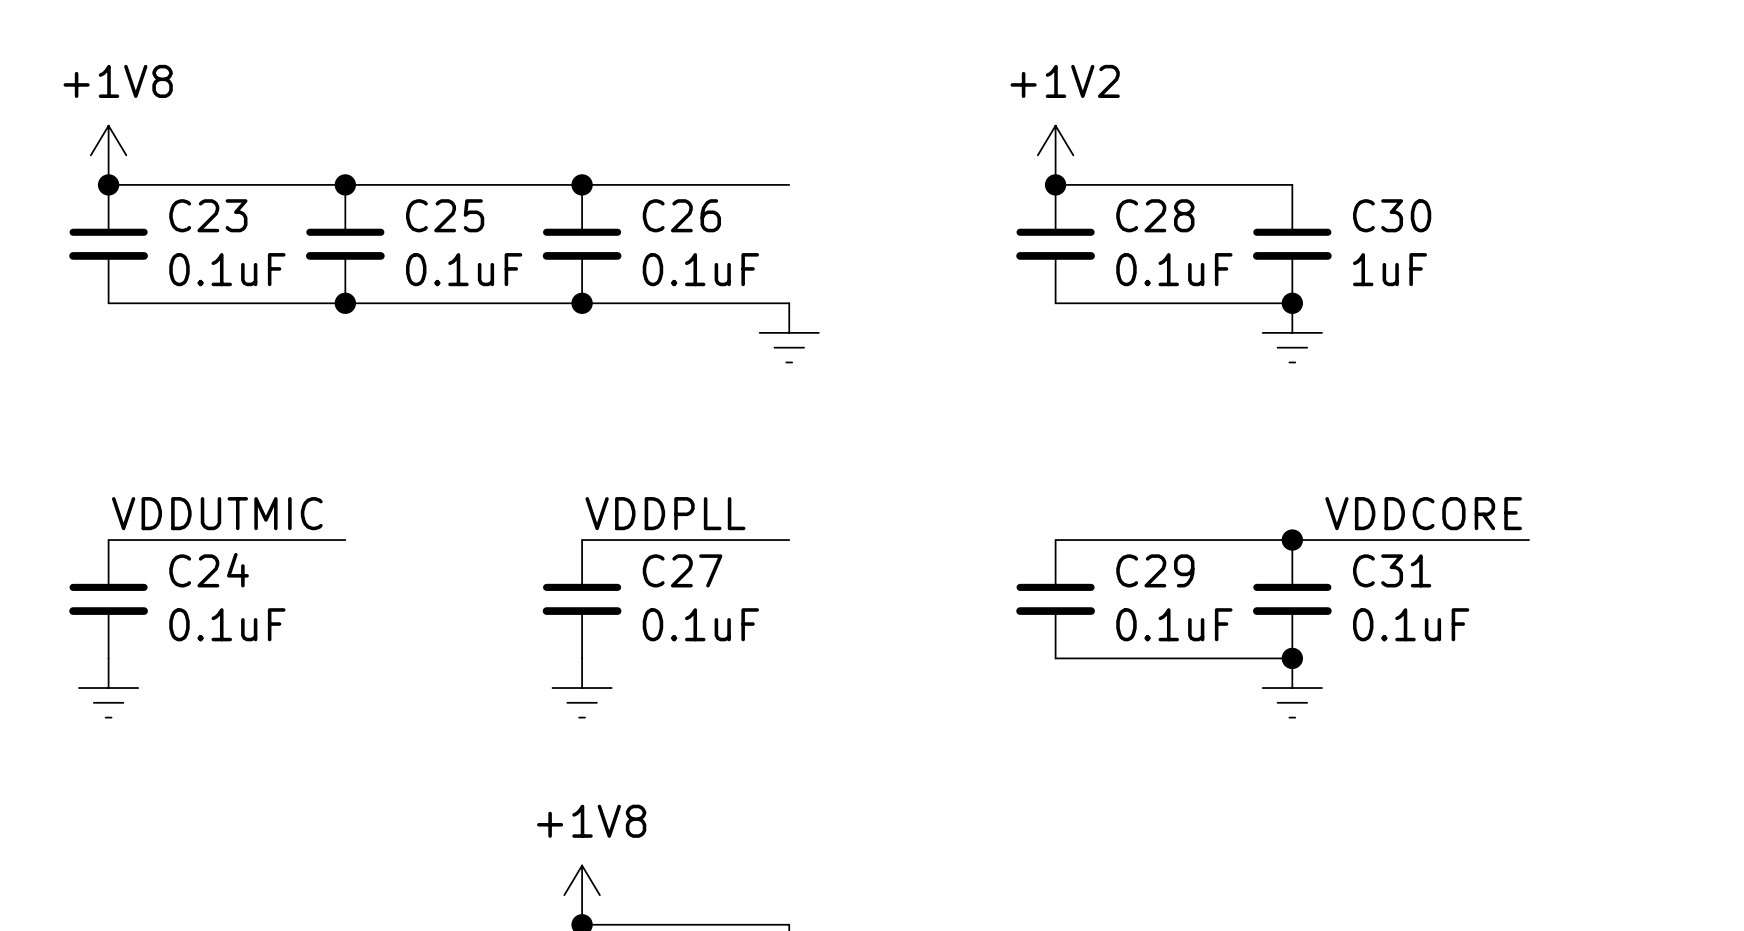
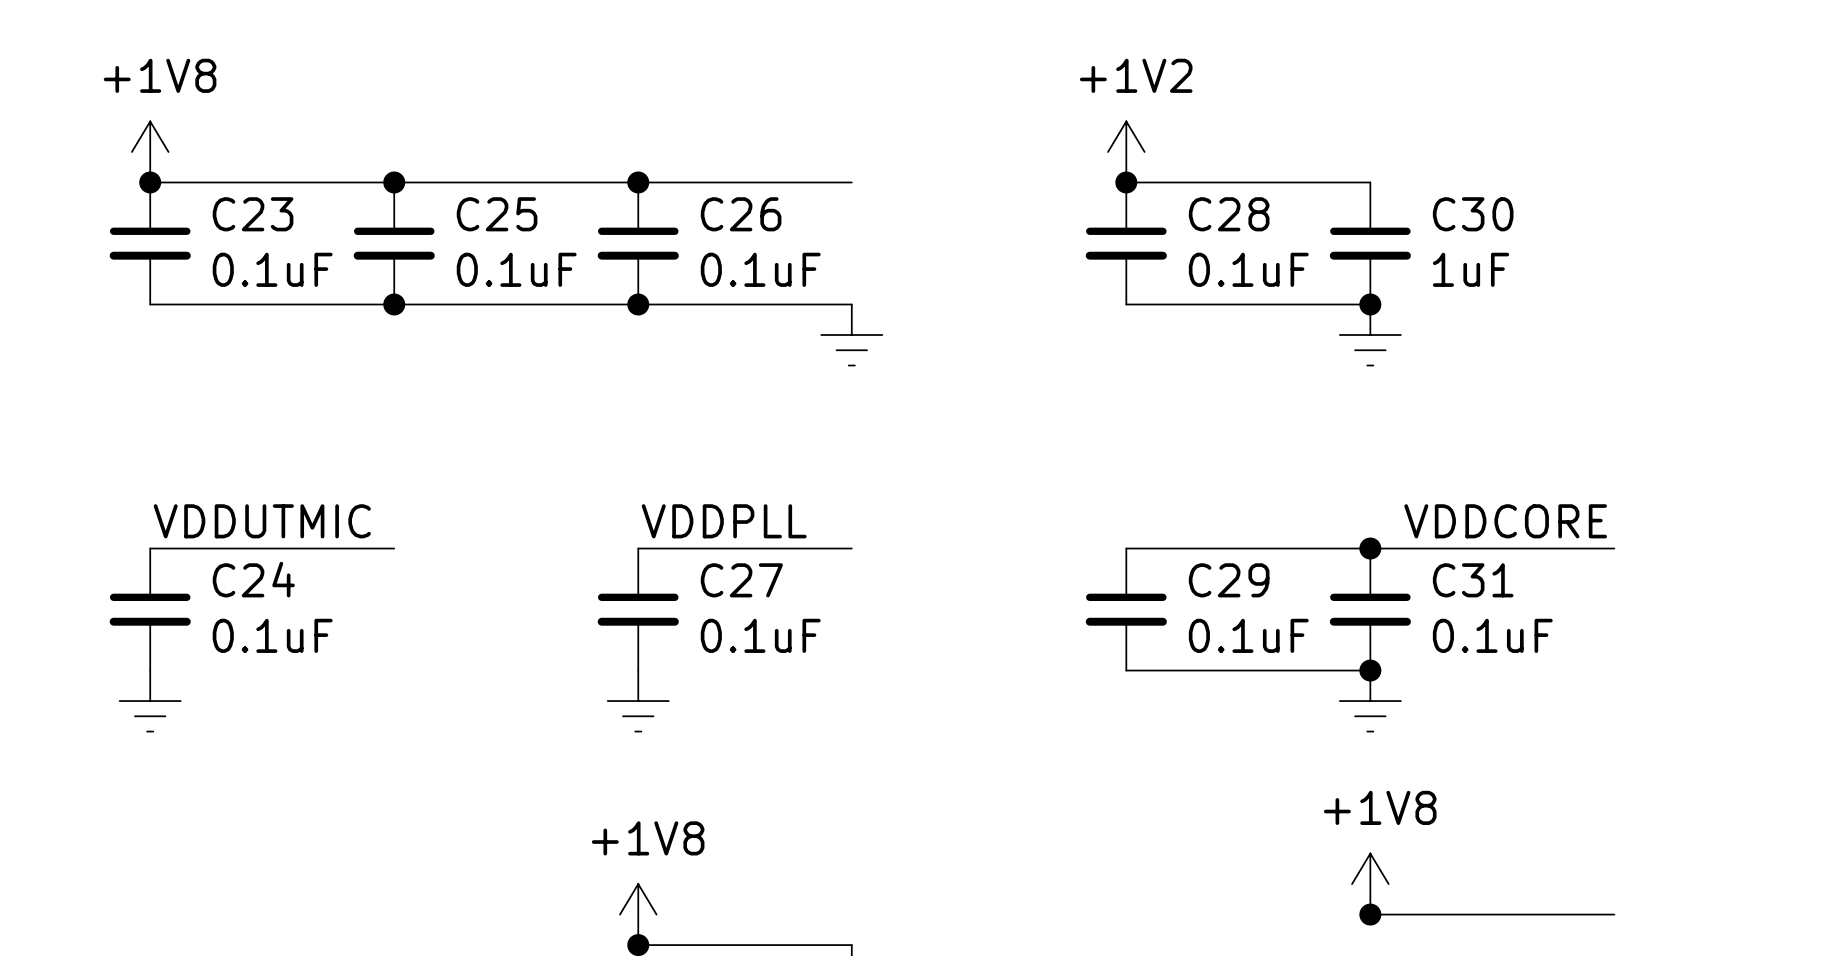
power symbol: none -> +1V8 (1370, 884)
wire: none -> (1370, 914) (1614, 914)
junction: none -> (1370, 914)

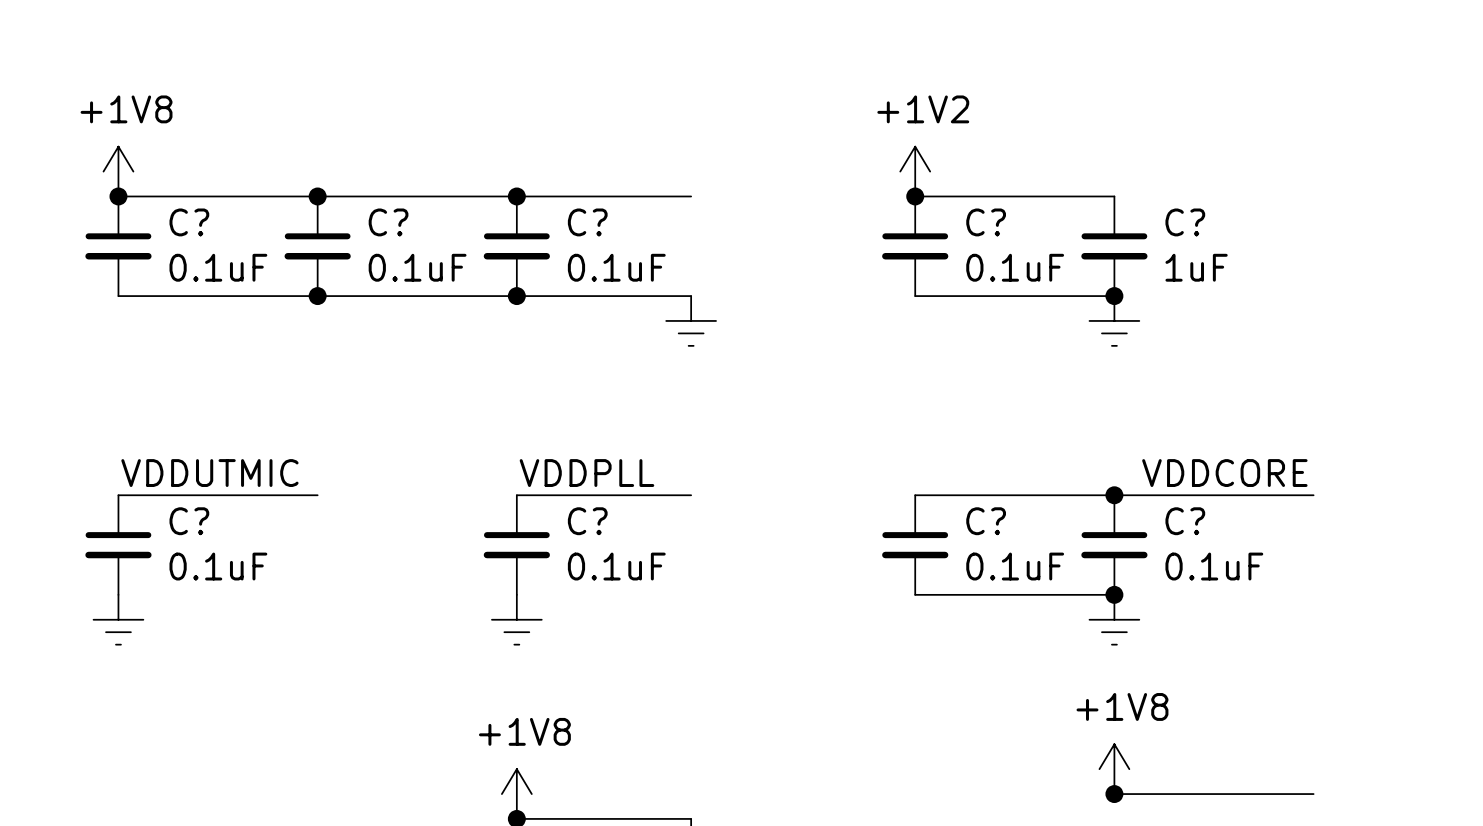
C23 name: C23 (253, 214) -> C? (189, 222)
C25 name: C25 (497, 214) -> C? (388, 222)
C26 name: C26 (741, 214) -> C? (587, 222)
C28 name: C28 (1229, 214) -> C? (986, 222)
C30 name: C30 (1473, 214) -> C? (1185, 222)
C24 name: C24 (253, 579) -> C? (189, 521)
C27 name: C27 (741, 580) -> C? (587, 521)
C29 name: C29 (1229, 580) -> C? (986, 521)
C31 name: C31 (1473, 580) -> C? (1185, 521)

